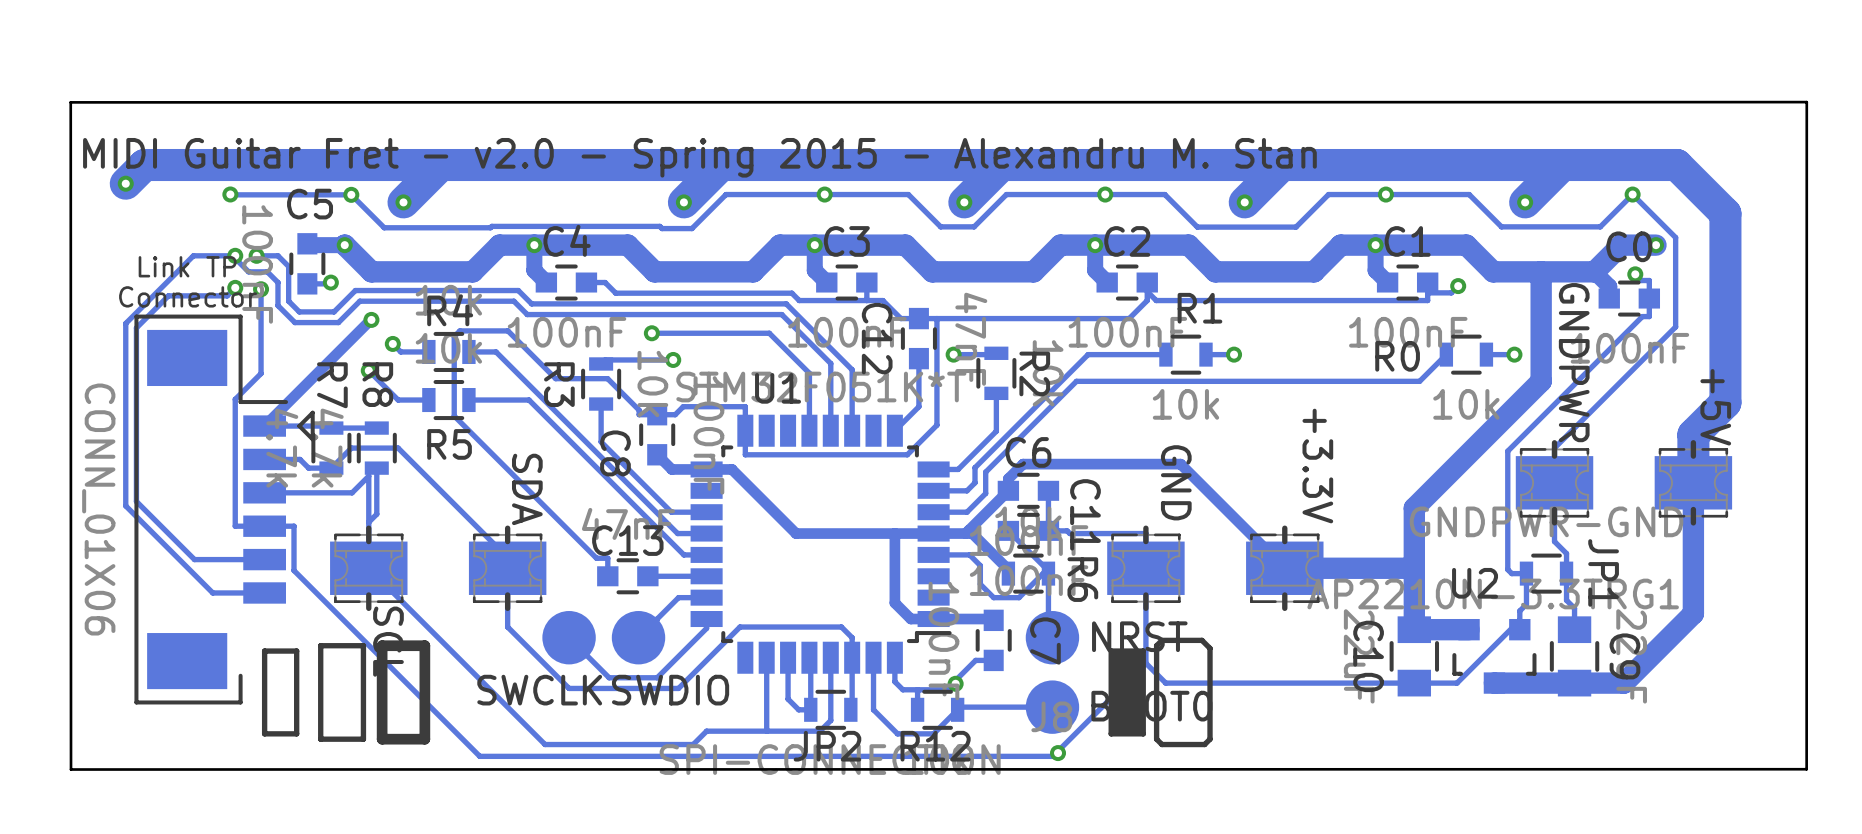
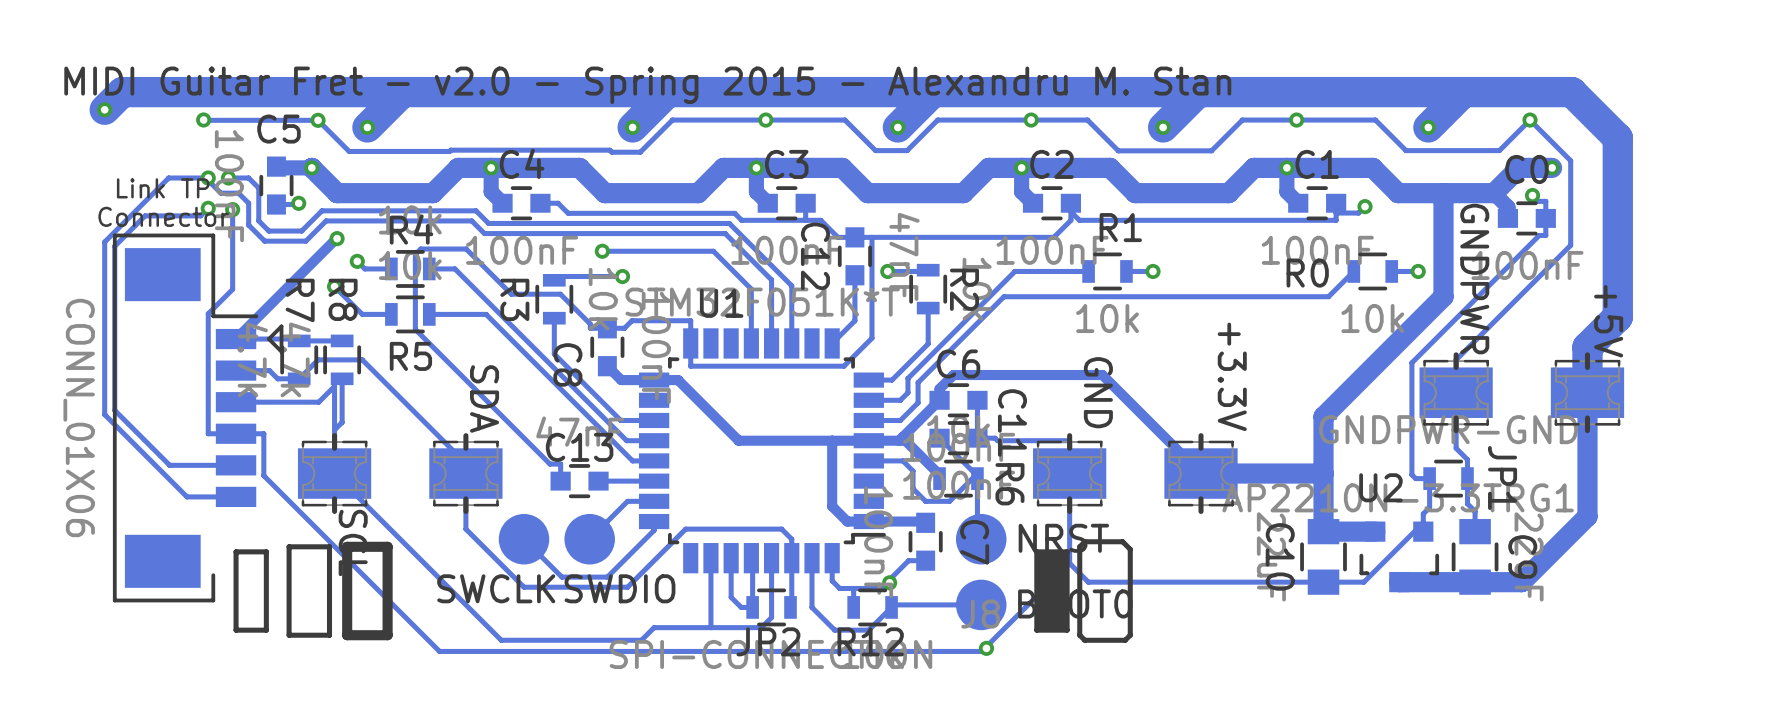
board edge: (1806, 102) (1806, 769) (71, 769) (70, 102) (1806, 102) -> none

